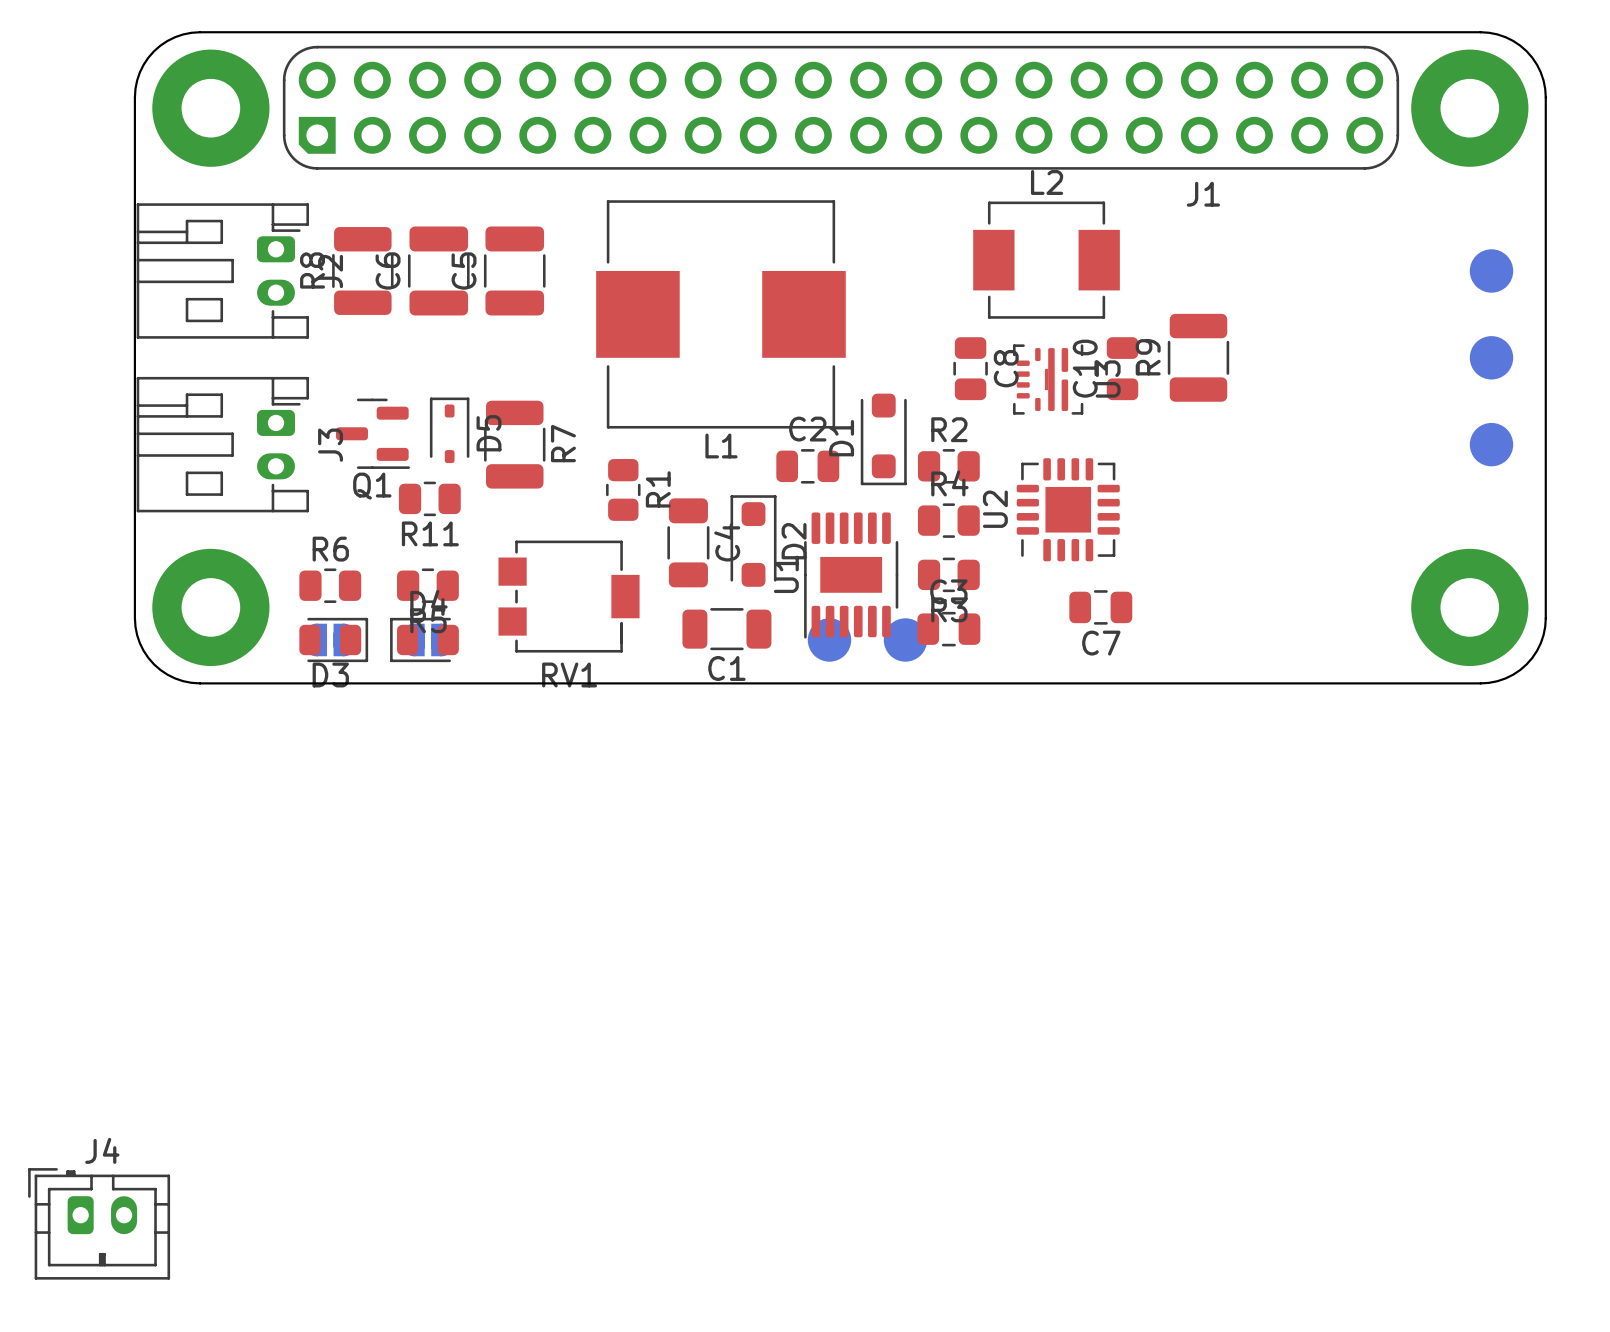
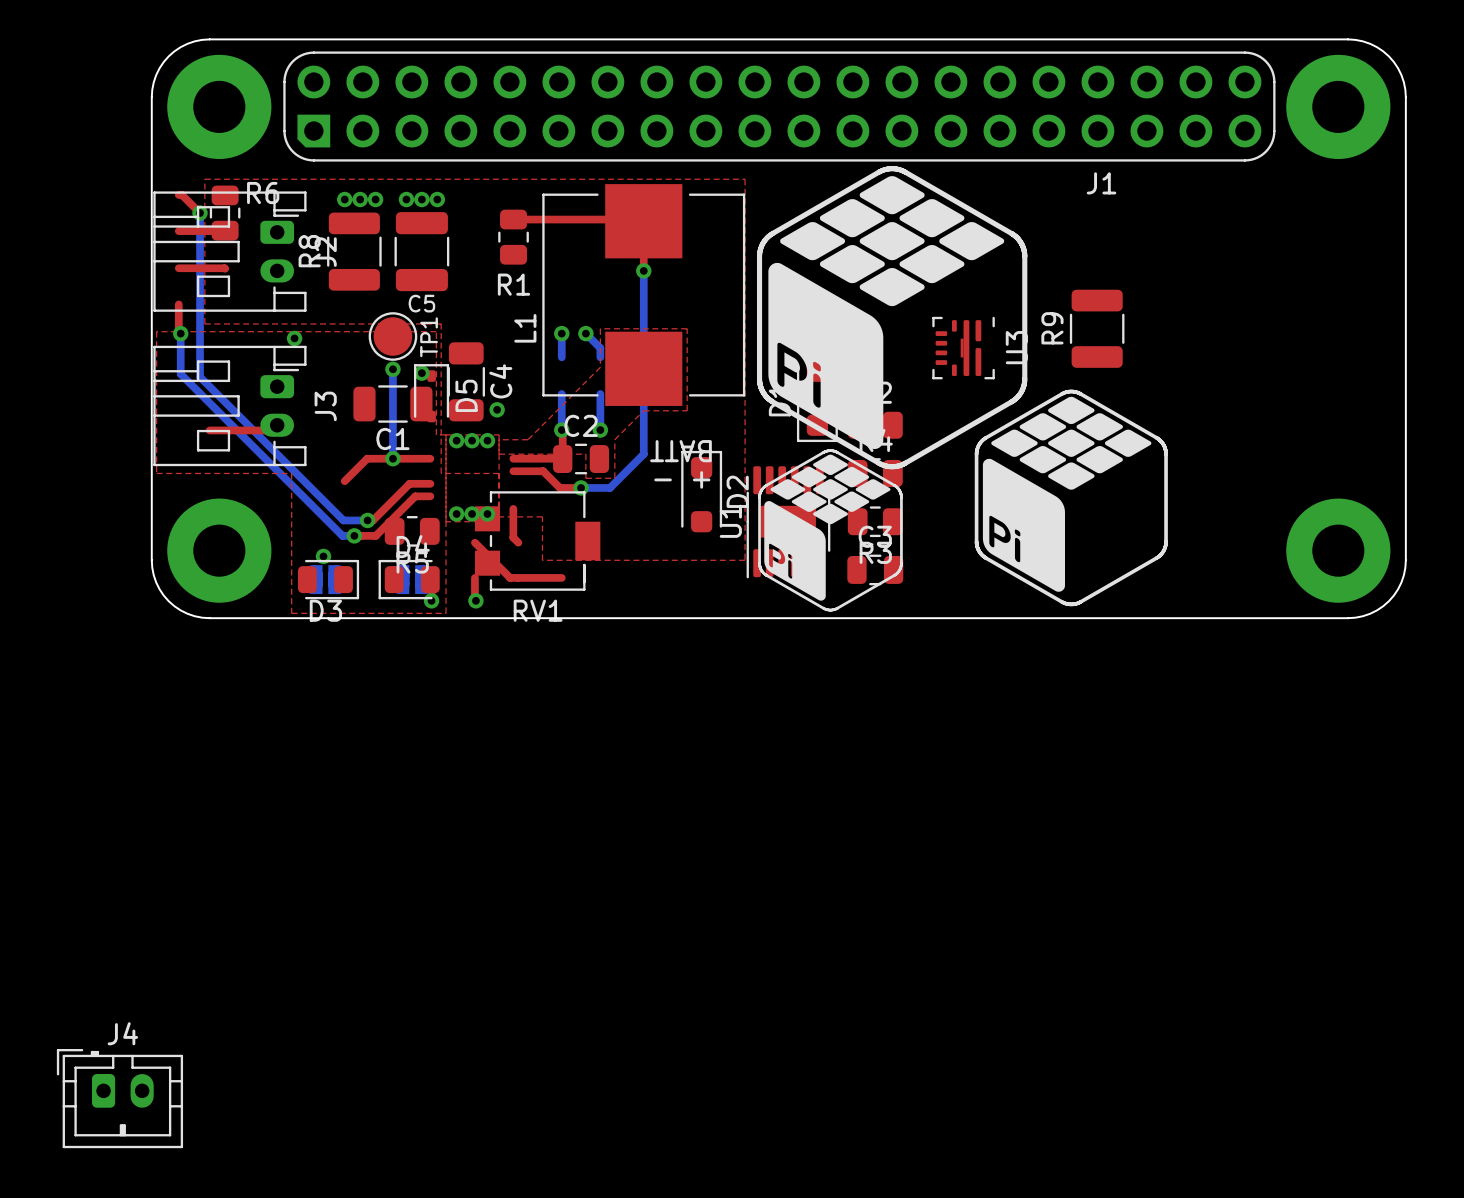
drawing: none -> [756, 166, 1168, 612]
top track: none -> (178, 194) (181, 194) (200, 213)
via: none -> (344, 199)
via: none -> (360, 199)
via: none -> (375, 199)
via: none -> (406, 199)
via: none -> (421, 199)
via: none -> (437, 199)
bottom track: none -> (200, 213) (200, 377) (343, 520) (367, 520)
via: none -> (200, 213)
top track: none -> (513, 219) (642, 219) (643, 221) (643, 270)
top track: none -> (225, 230) (178, 231)
L2: (1046, 260) -> none
C6 name: C6 (388, 270) -> C5 (421, 303)
C5: (514, 270) -> none
part: (1491, 270) -> none
top track: none -> (178, 268) (225, 268)
bottom track: none -> (643, 270) (643, 454) (610, 487) (581, 487)
via: none -> (643, 270)
L1 rotation: 0° (720, 314) -> 90° clockwise (643, 295)
top track: none -> (178, 304) (178, 331) (180, 333)
part: (1491, 357) -> none
bottom track: none -> (180, 333) (180, 374) (342, 535) (354, 535)
via: none -> (180, 333)
bottom track: none -> (561, 333) (561, 357)
via: none -> (561, 333)
bottom track: none -> (585, 333) (600, 348) (600, 357)
via: none -> (585, 333)
via: none -> (294, 338)
C8: (970, 368) -> none
C10: (1122, 368) -> none
bottom track: none -> (392, 369) (392, 458)
via: none -> (392, 369)
via: none -> (421, 373)
bottom track: none -> (561, 393) (561, 430)
bottom track: none -> (600, 393) (600, 430)
Q1: (372, 433) -> none
R7: (514, 444) -> none
part: (1491, 444) -> none
via: none -> (497, 409)
top track: none -> (286, 425) (281, 430) (209, 430)
C2 position: (807, 466) -> (581, 459)
top track: none -> (561, 430) (562, 459) (513, 458)
via: none -> (561, 430)
via: none -> (600, 430)
top zone outline: none -> (446, 434) (446, 613) (291, 613) (291, 473) (156, 473) (156, 331) (436, 331) (436, 434) (499, 434) (499, 521) (446, 521)
top zone outline: none -> (499, 439) (528, 439) (600, 367) (600, 328) (687, 328) (687, 410) (643, 410) (614, 439) (614, 478) (585, 478) (585, 454) (499, 454)
via: none -> (456, 440)
via: none -> (472, 440)
via: none -> (487, 440)
R1 position: (623, 489) -> (513, 237)
R1 name rotation: 0° (658, 489) -> 90° clockwise (514, 284)
R1 name position: R1 (658, 489) -> R1 (514, 284)
text: none -> BATT (680, 451)
R11: (429, 498) -> none
via: none -> (392, 458)
top track: none -> (430, 458) (367, 458) (344, 481)
U2: (1068, 509) -> none
top track: none -> (513, 471) (543, 471) (559, 487) (581, 487)
top zone outline: none -> (499, 473) (441, 473) (441, 323) (204, 323) (204, 179) (745, 179) (745, 560) (542, 560) (542, 516) (499, 516)
text: none -> + - (682, 479)
top track: none -> (430, 483) (409, 483) (373, 520) (367, 520)
via: none -> (581, 487)
C4 position: (688, 542) -> (466, 381)
top track: none -> (430, 496) (415, 496) (375, 535) (354, 535)
top track: none -> (513, 508) (513, 537) (518, 542)
via: none -> (456, 514)
via: none -> (472, 514)
via: none -> (487, 514)
via: none -> (367, 520)
R6 rotation: 0° (330, 585) -> 90° clockwise (225, 213)
R6 position: (330, 585) -> (225, 213)
via: none -> (354, 535)
top track: none -> (474, 542) (510, 577) (561, 577)
C7: (1100, 607) -> none
via: none -> (323, 556)
C1 position: (726, 629) -> (392, 404)
top track: none -> (474, 577) (475, 600)
TP1 side: bottom (829, 639) -> top (392, 336)
part: (905, 639) -> none
via: none -> (431, 600)
via: none -> (475, 600)

